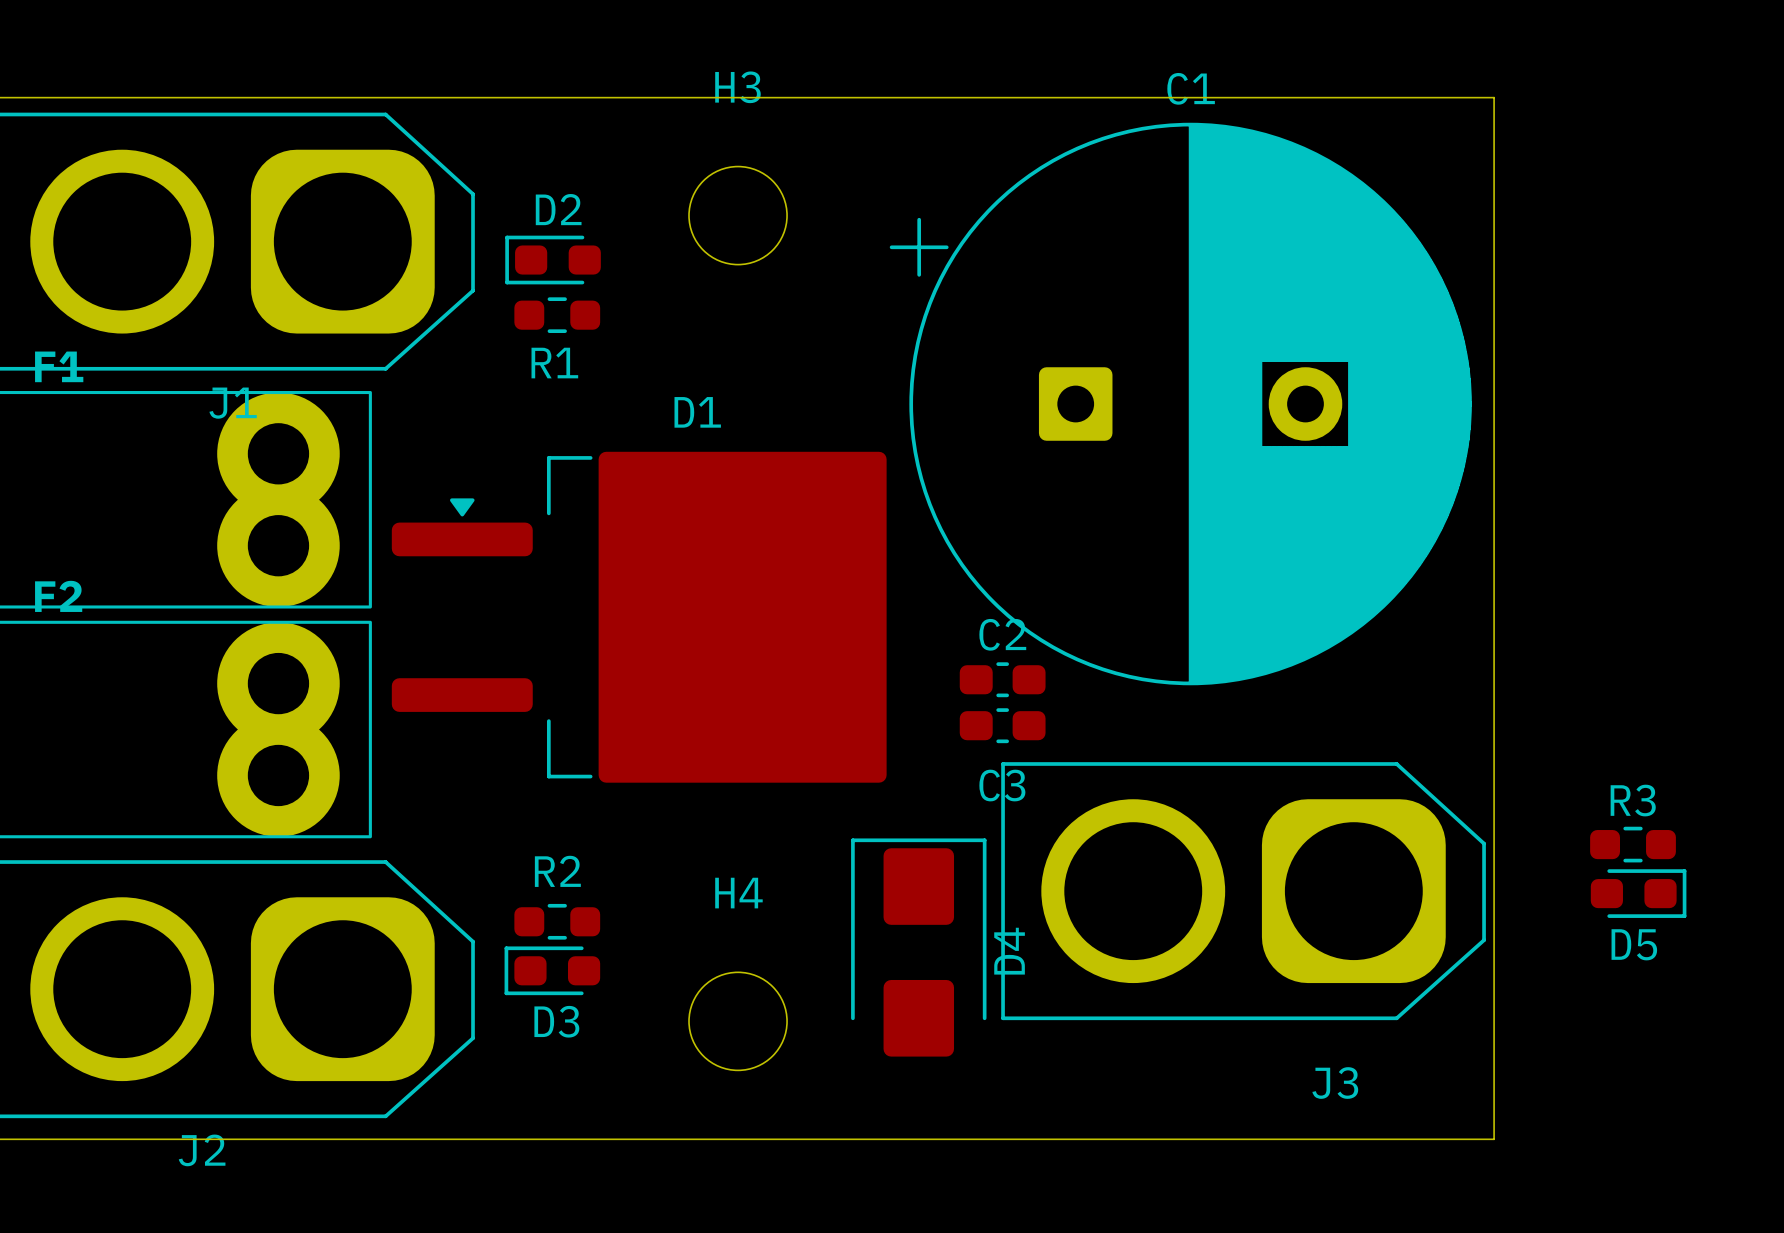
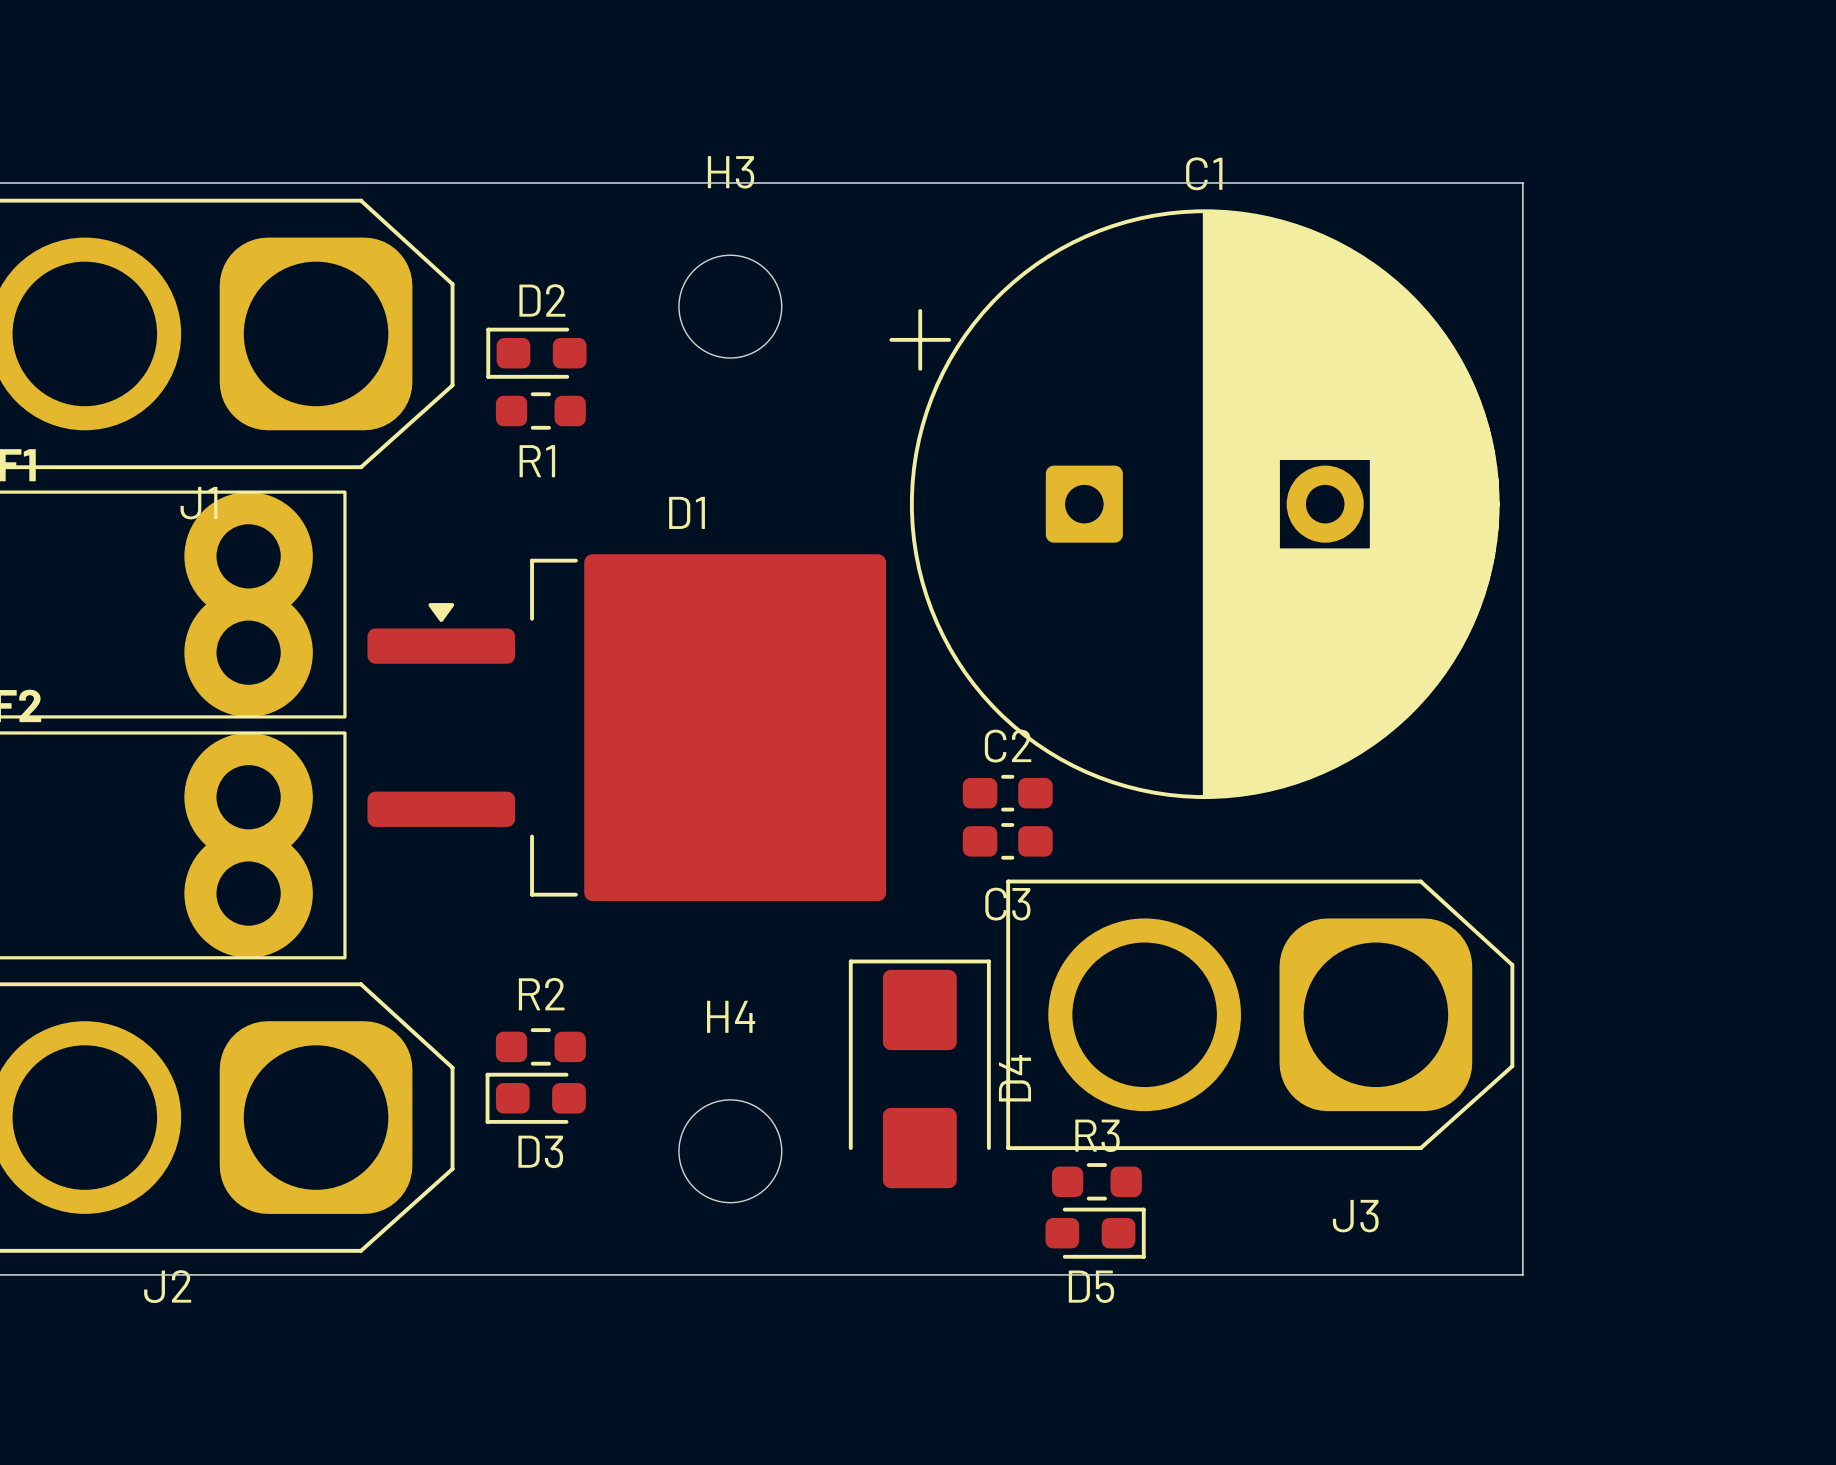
R3 position: (1633, 844) -> (1096, 1181)
D5 position: (1638, 893) -> (1095, 1233)

